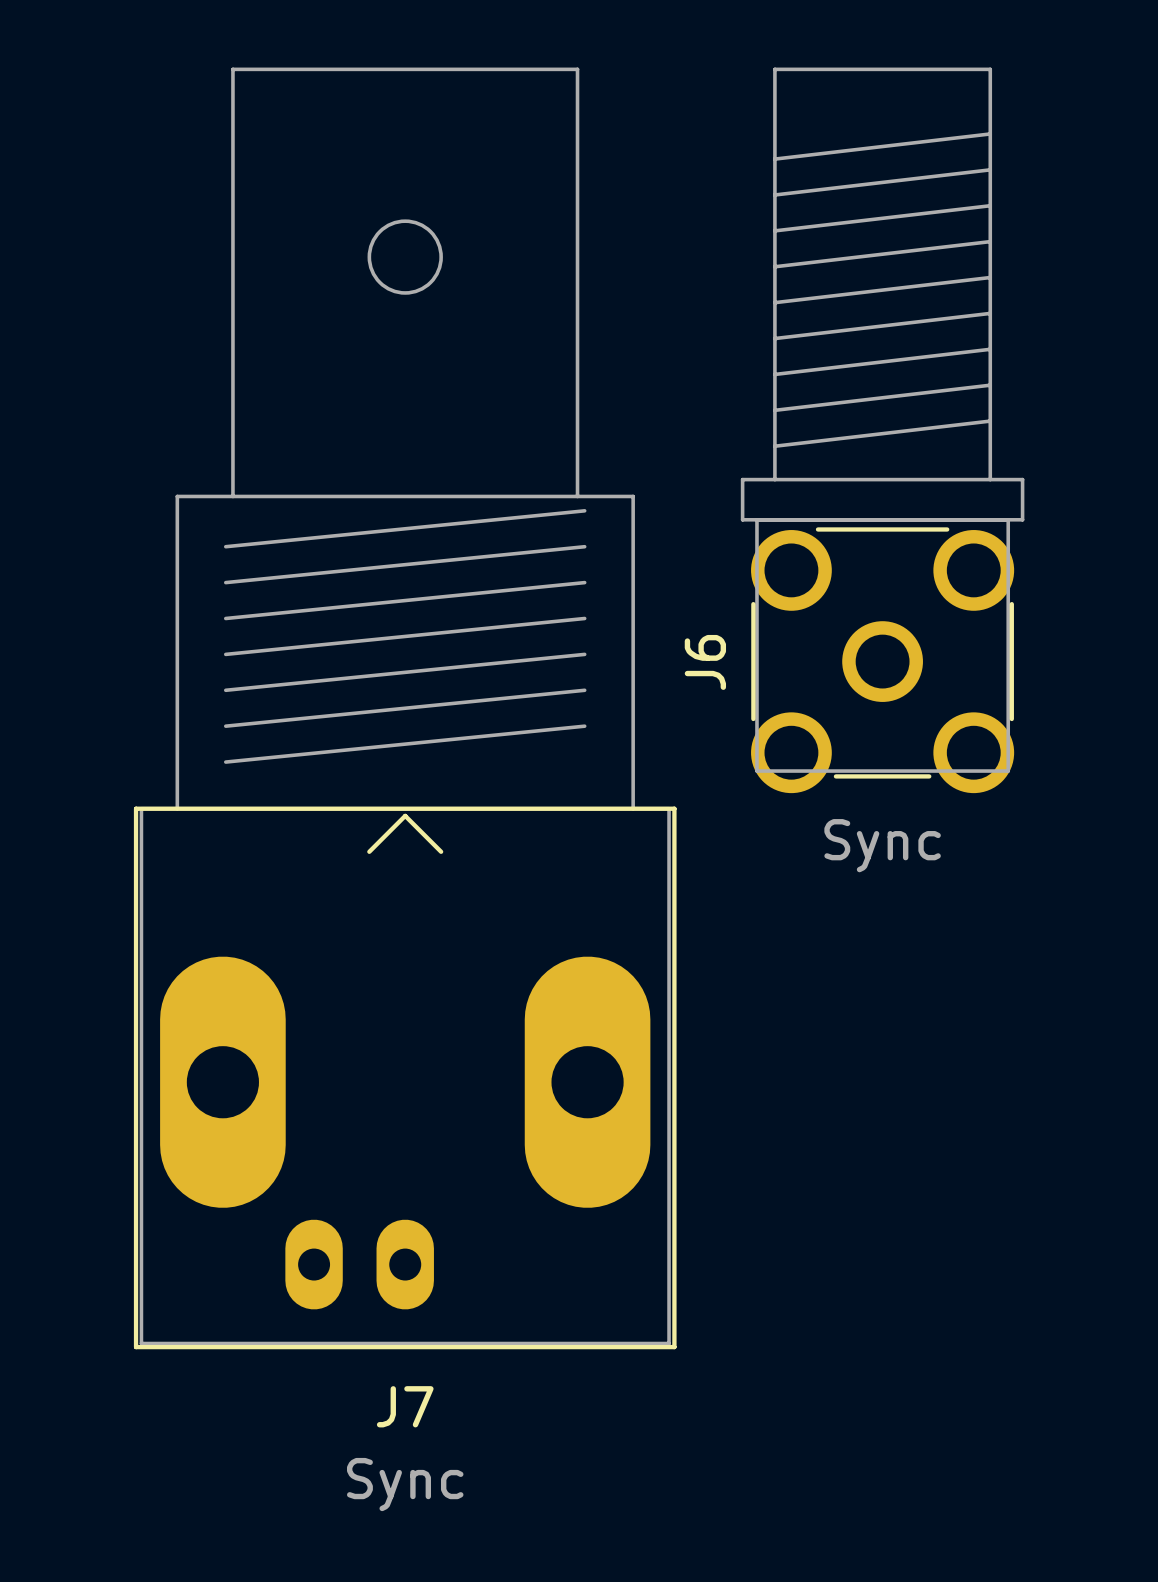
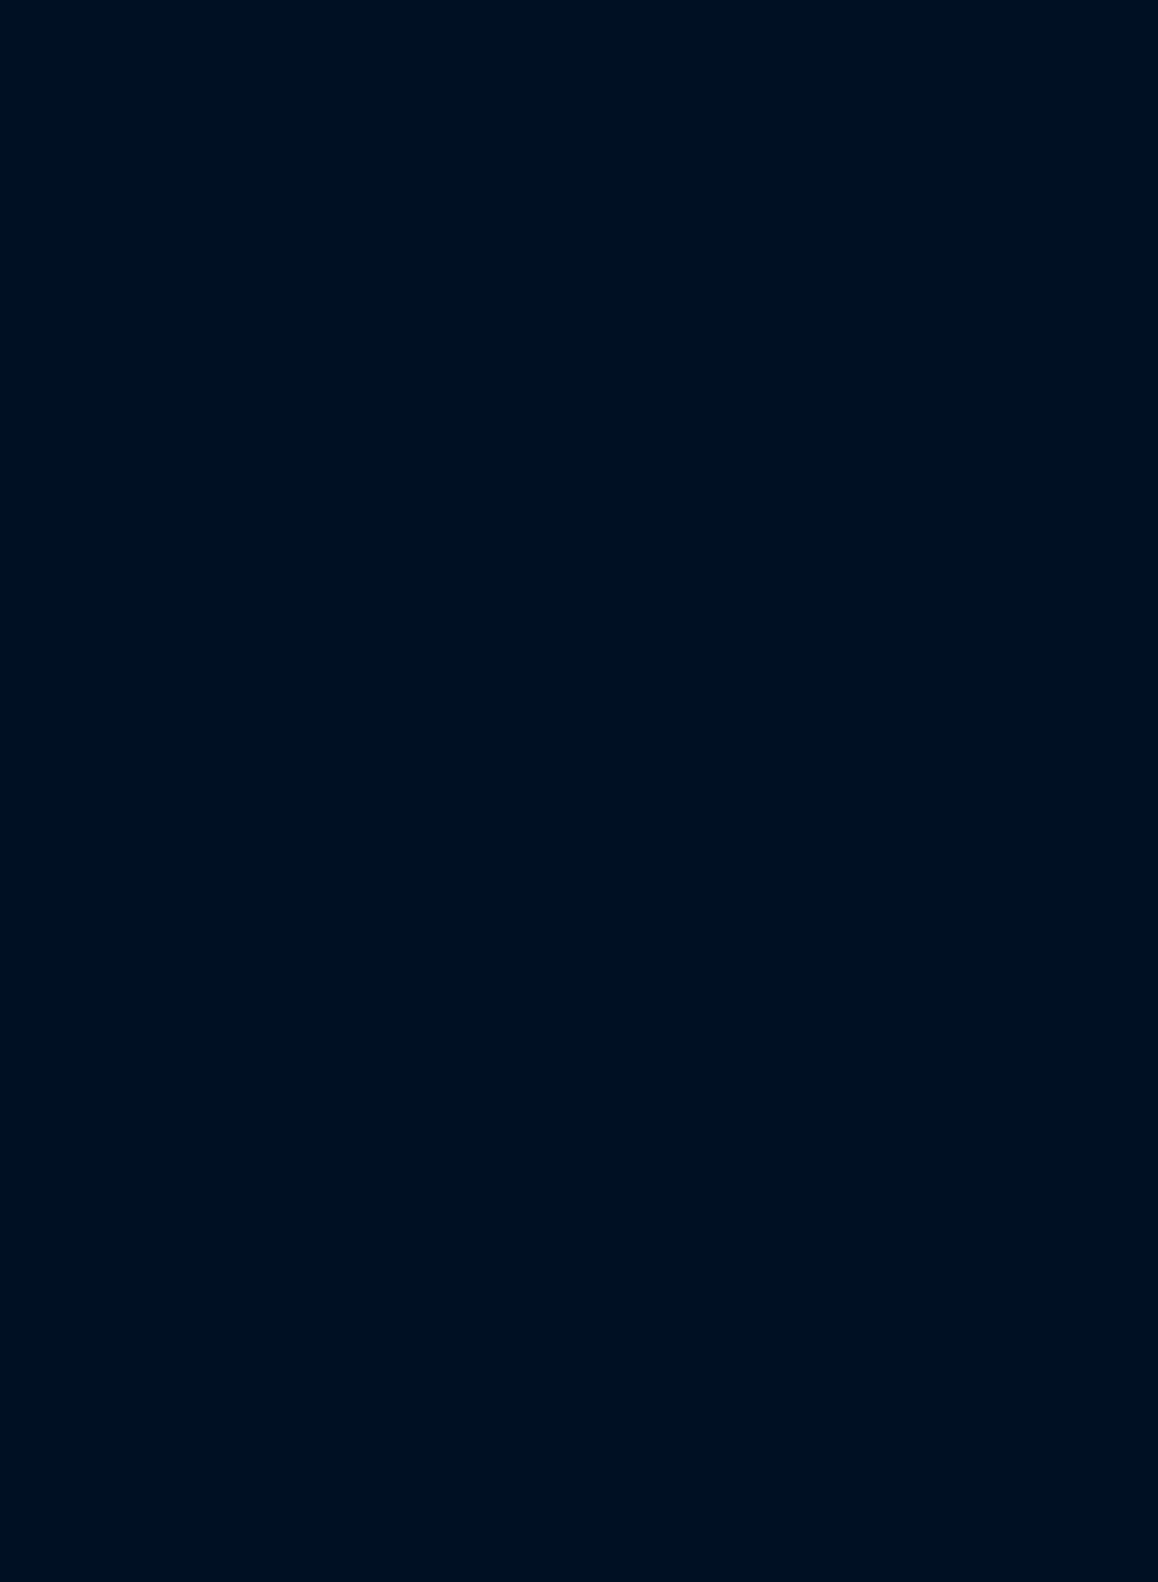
J6: Sync (882, 430) -> none
J7: Sync (405, 708) -> none

